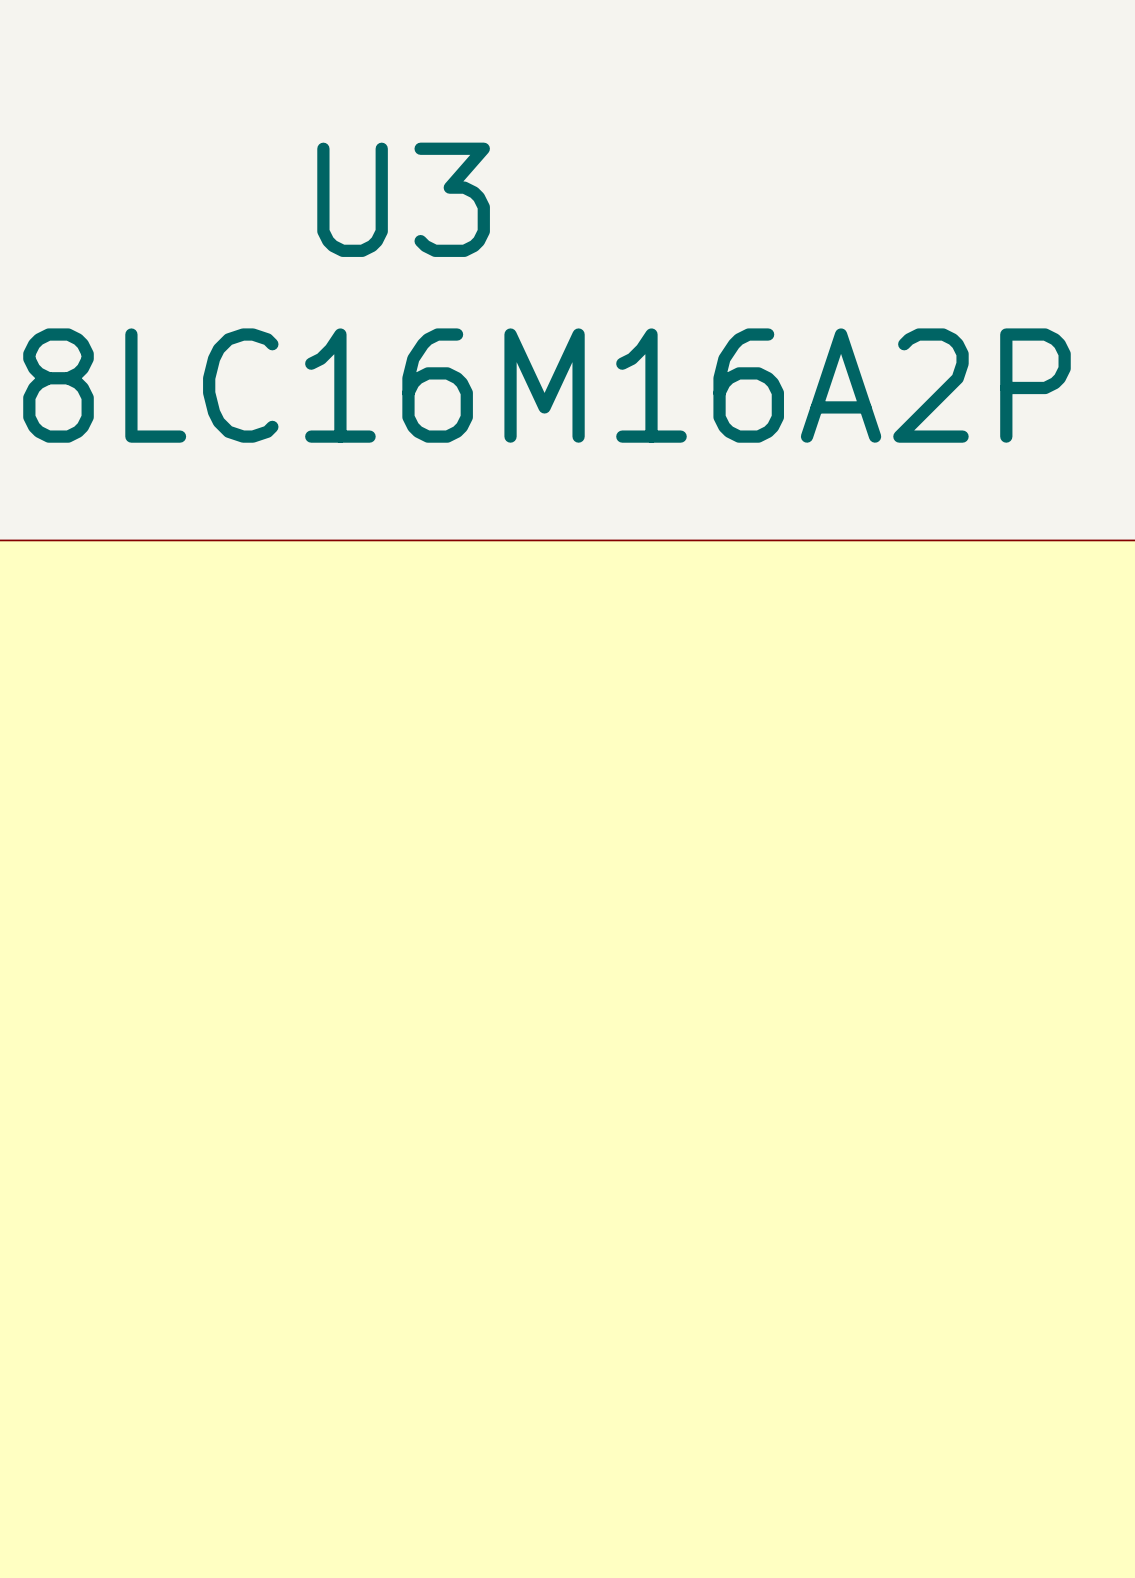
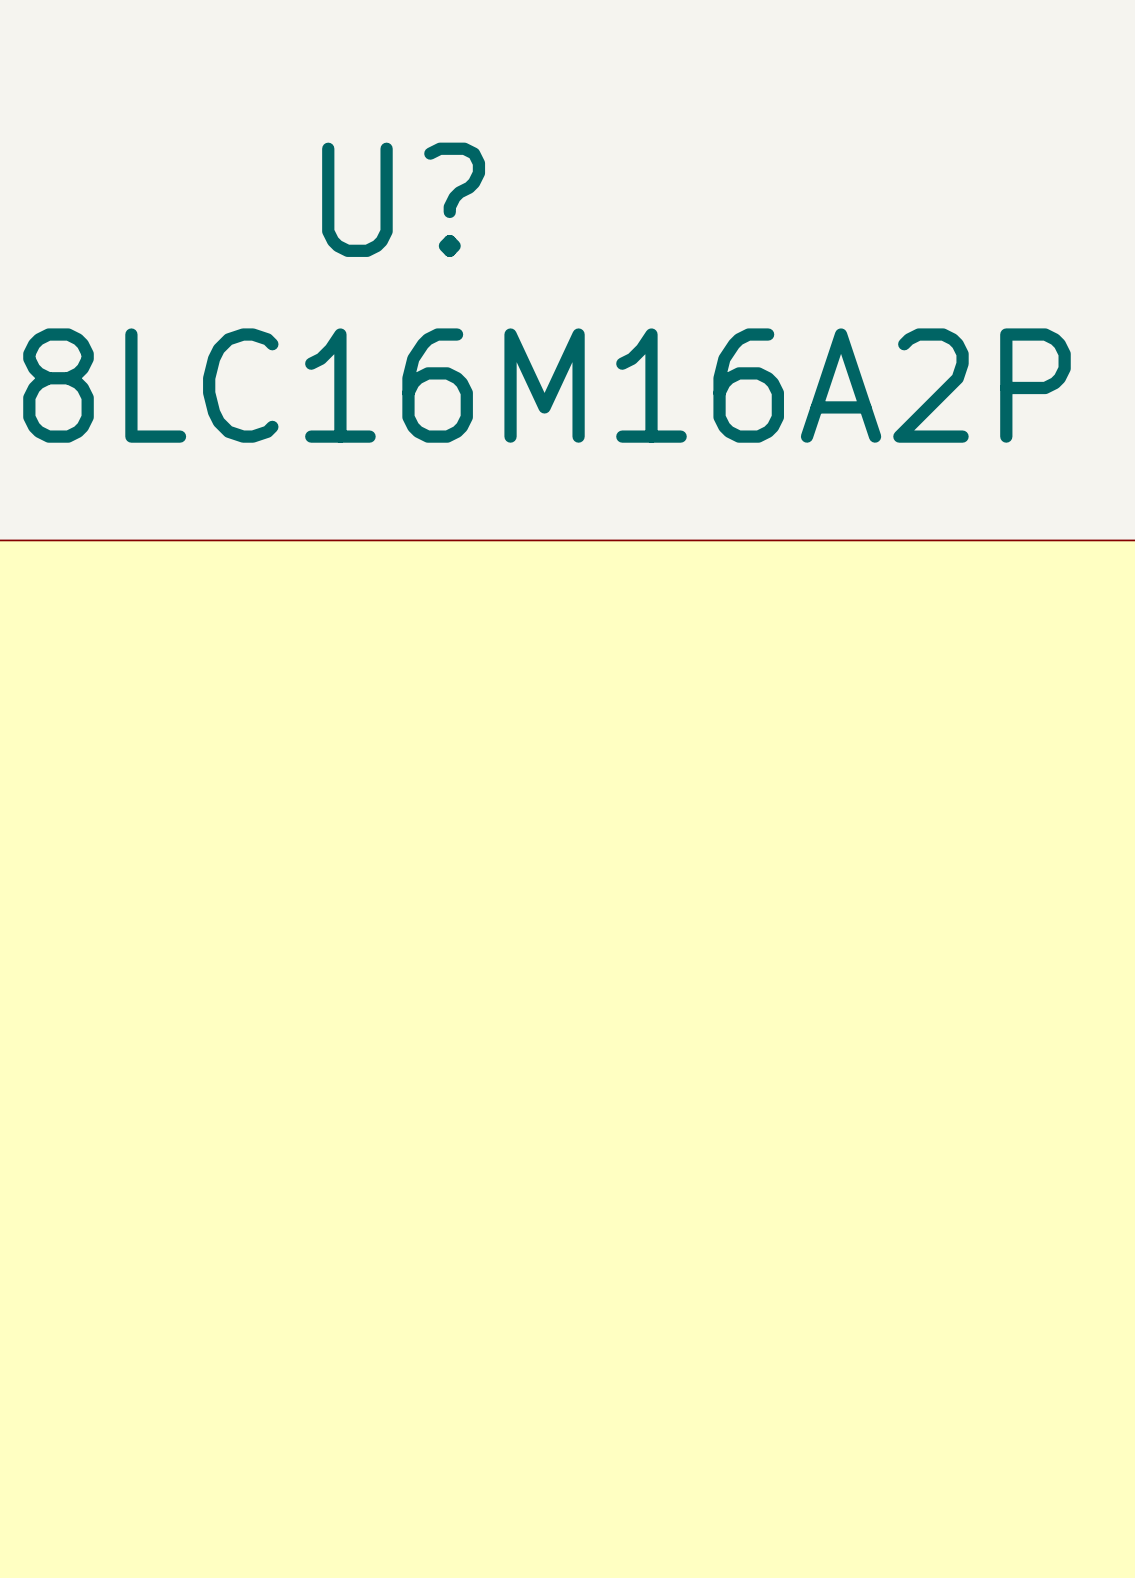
U3 name: U3 (403, 199) -> U? (403, 199)

